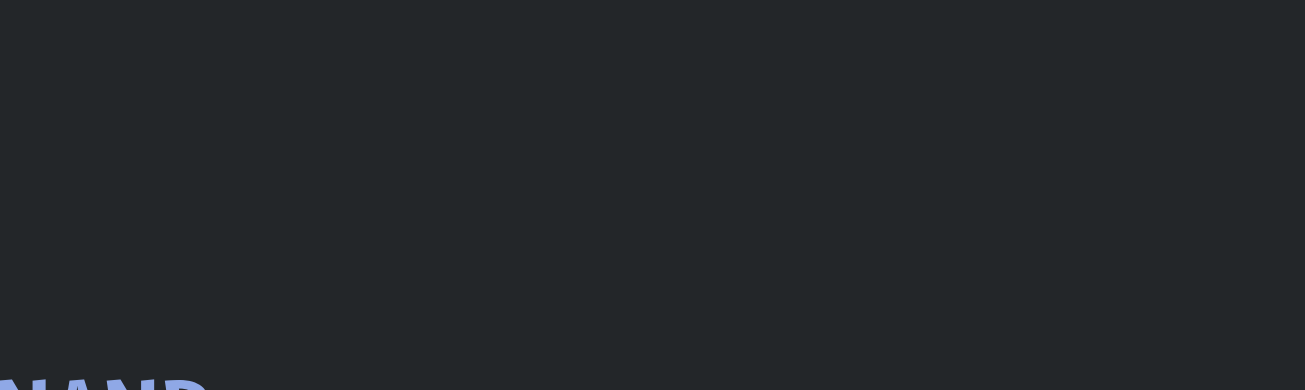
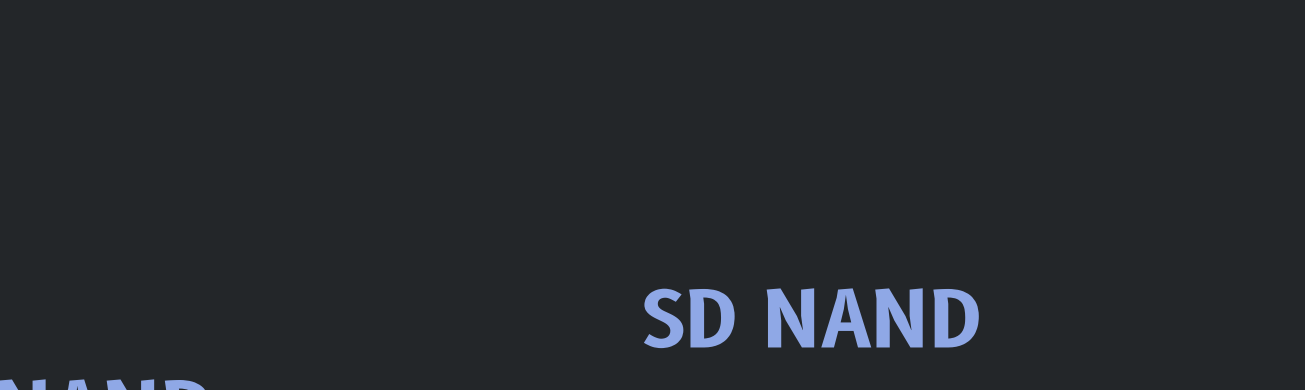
text: none -> SD NAND (811, 318)

